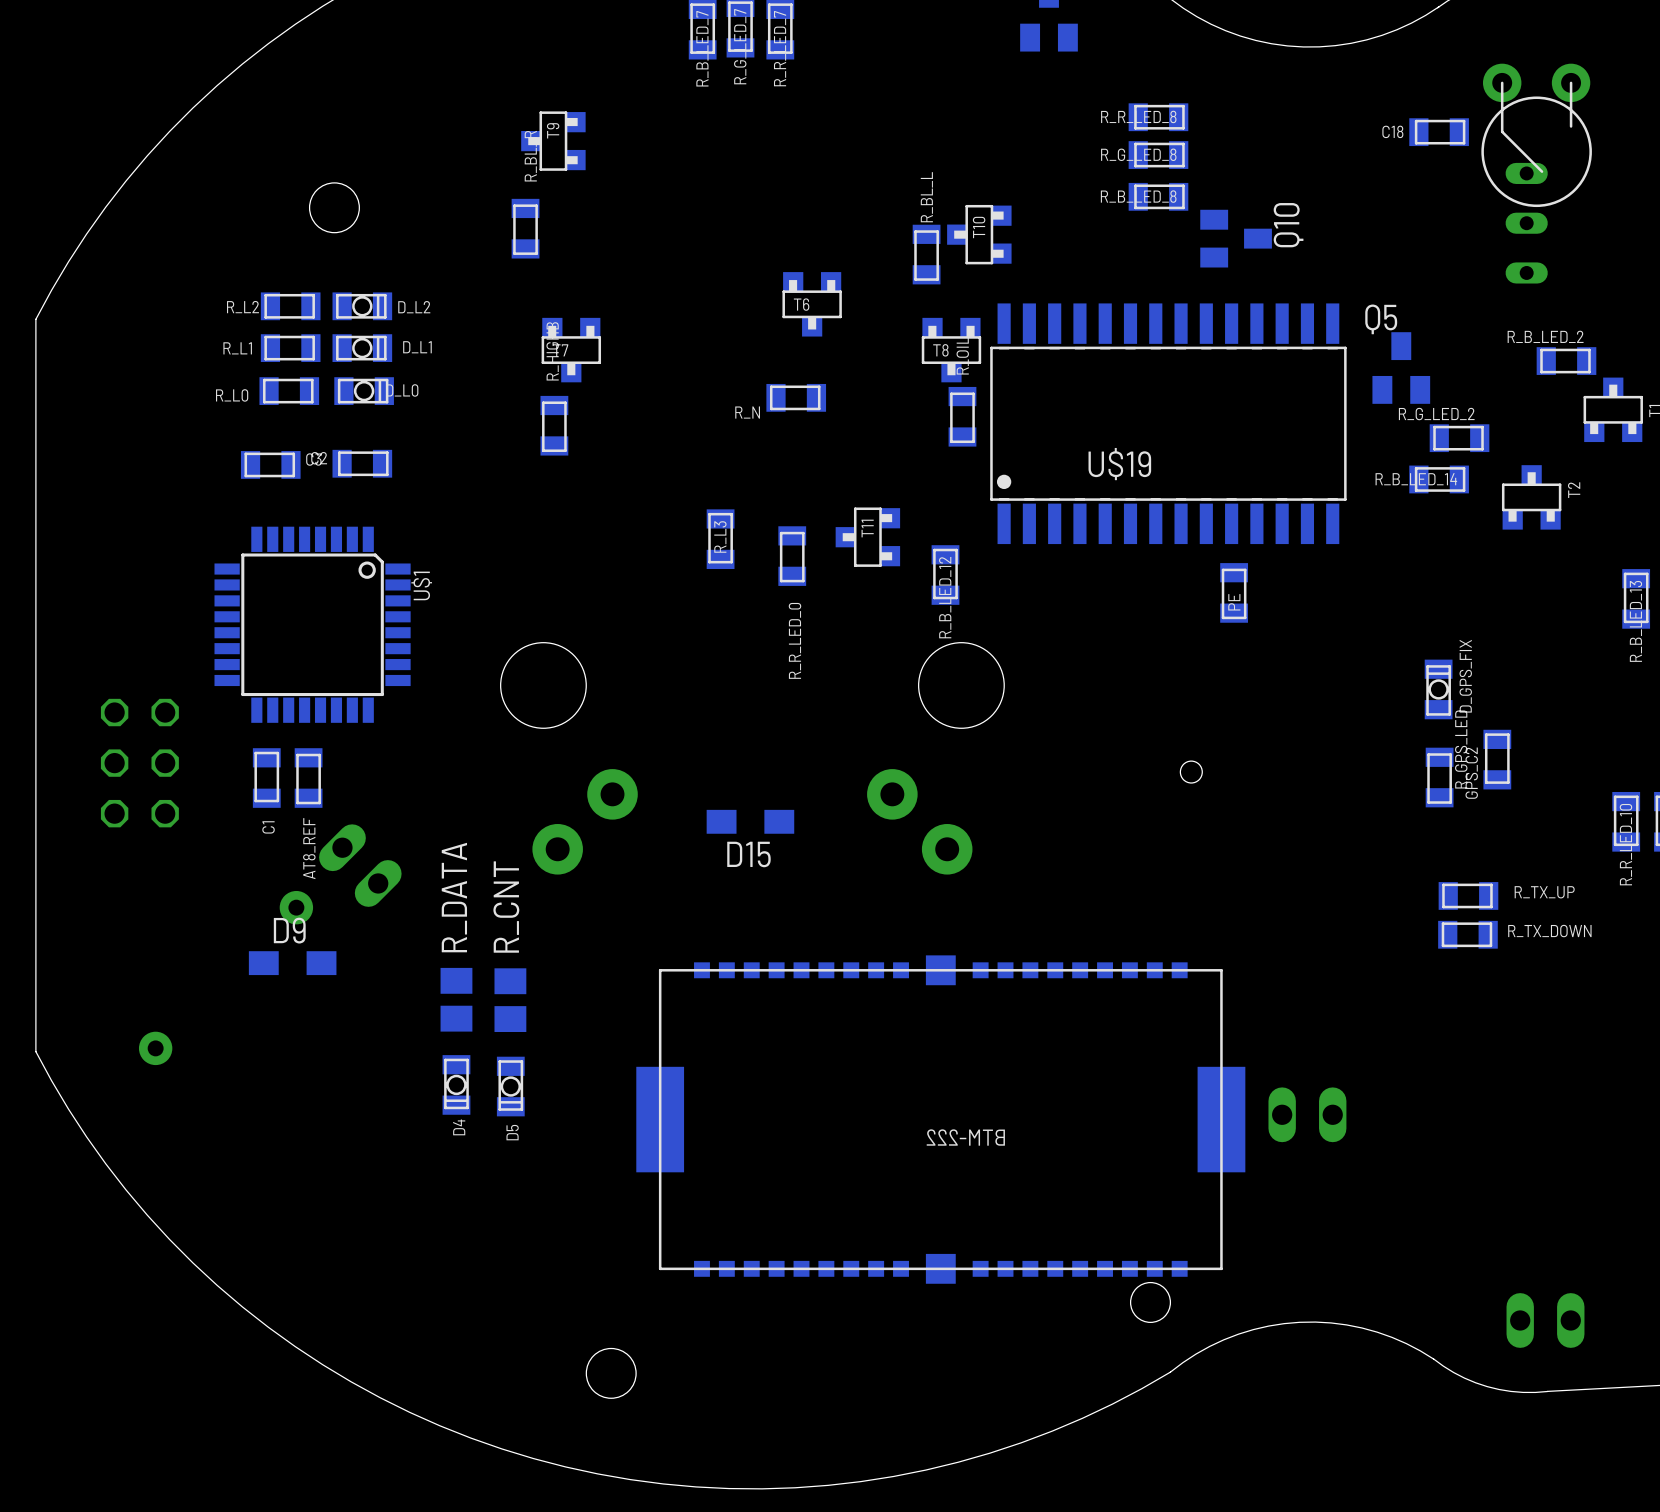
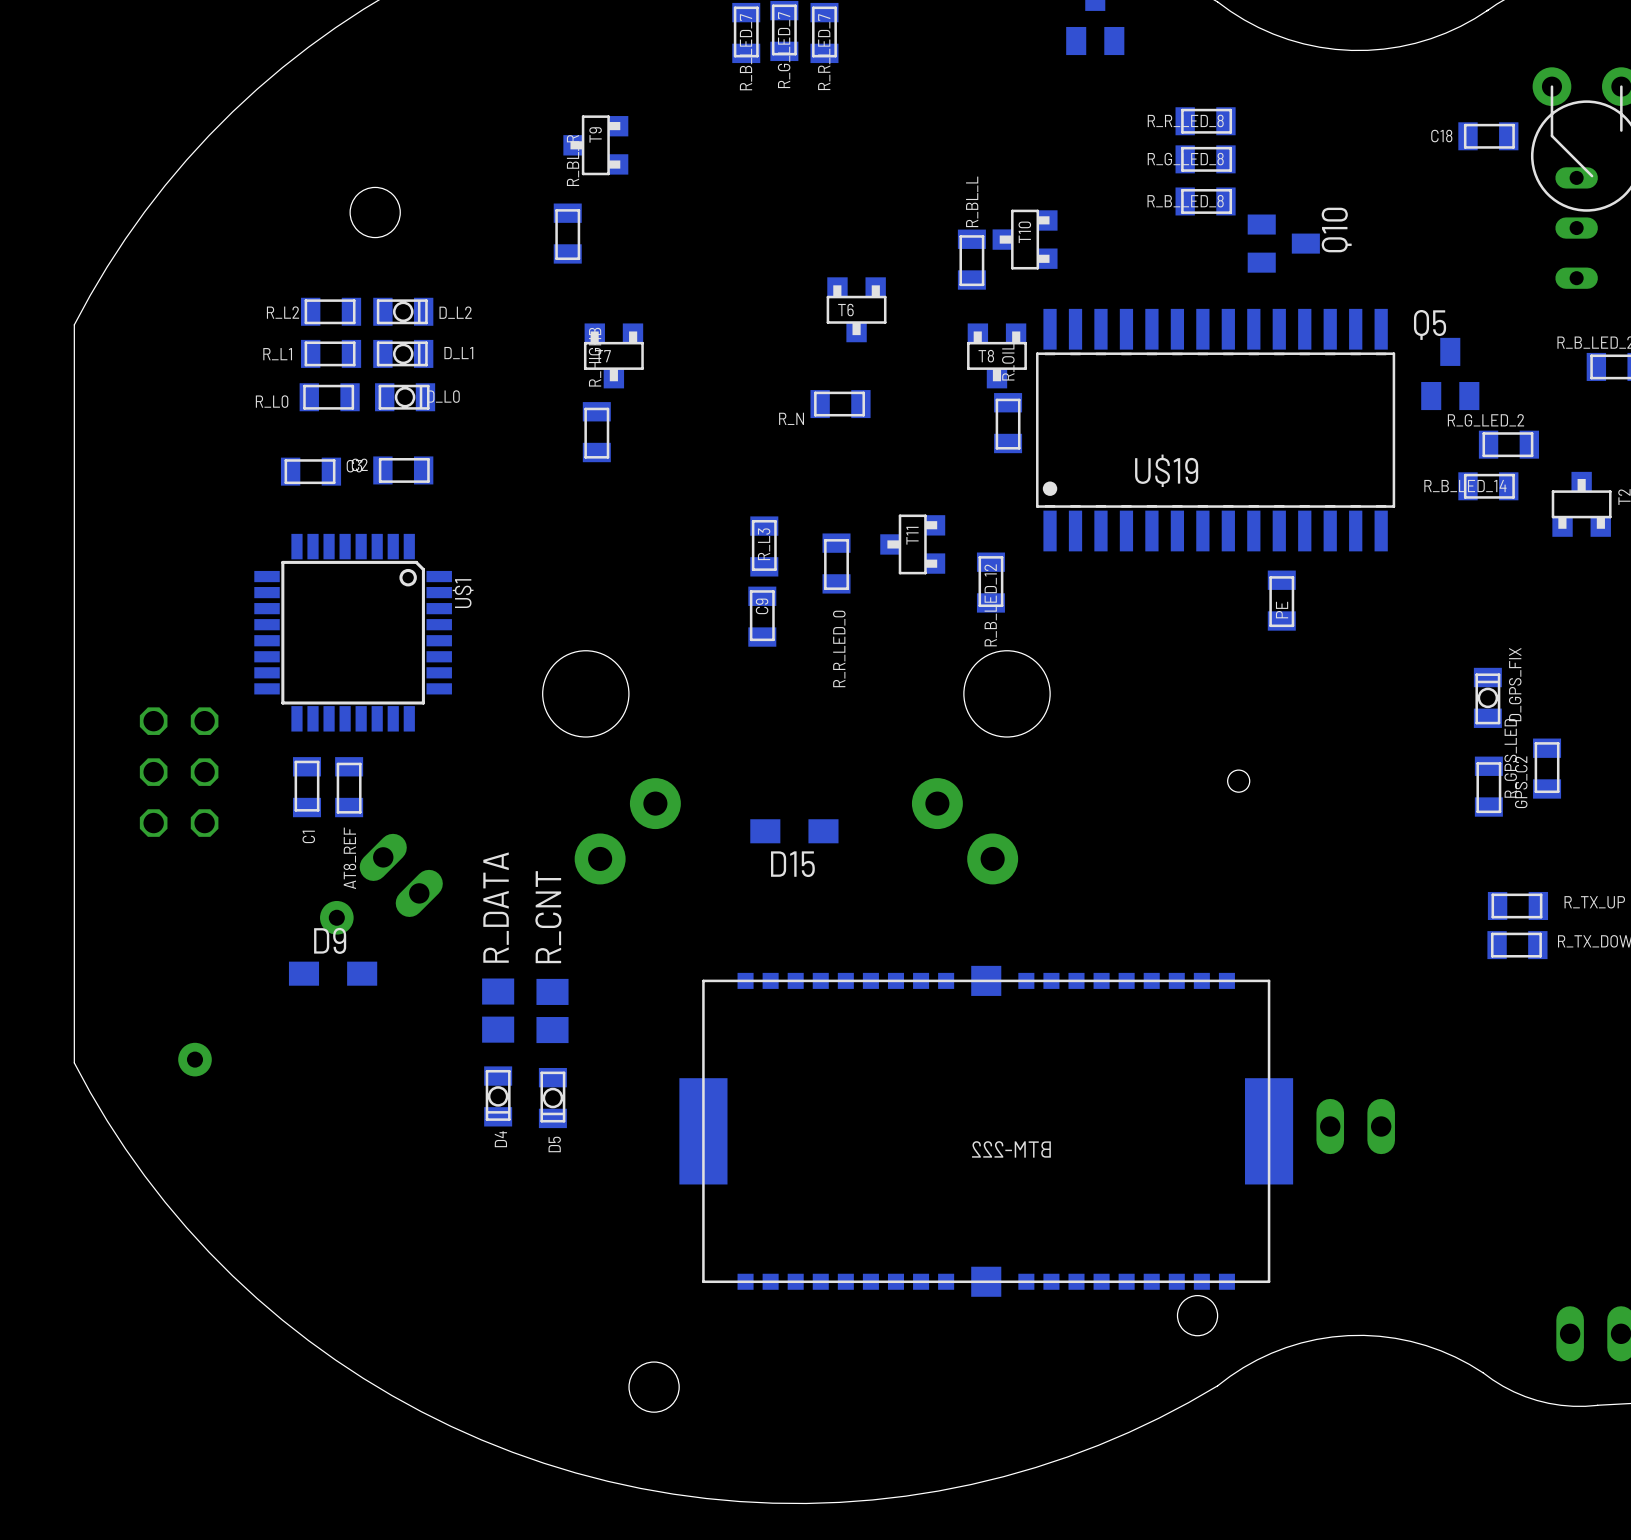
C9: none -> (762, 616)

